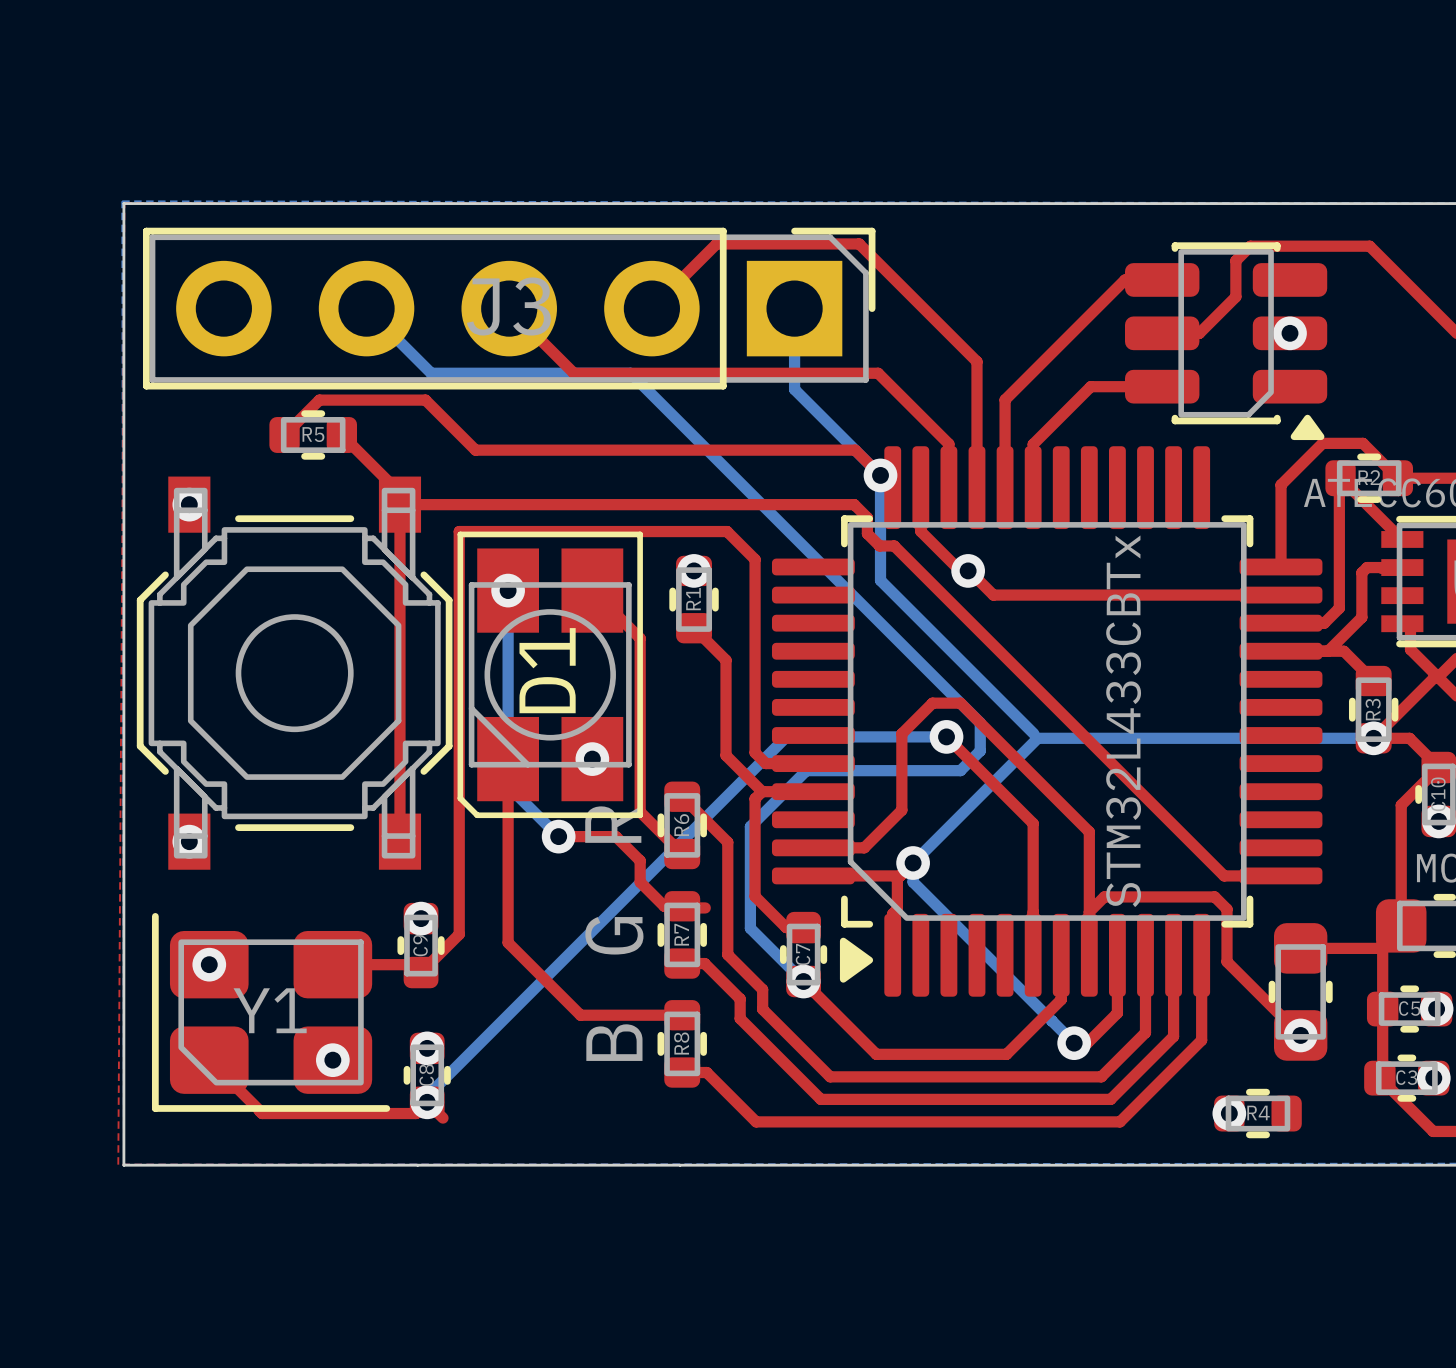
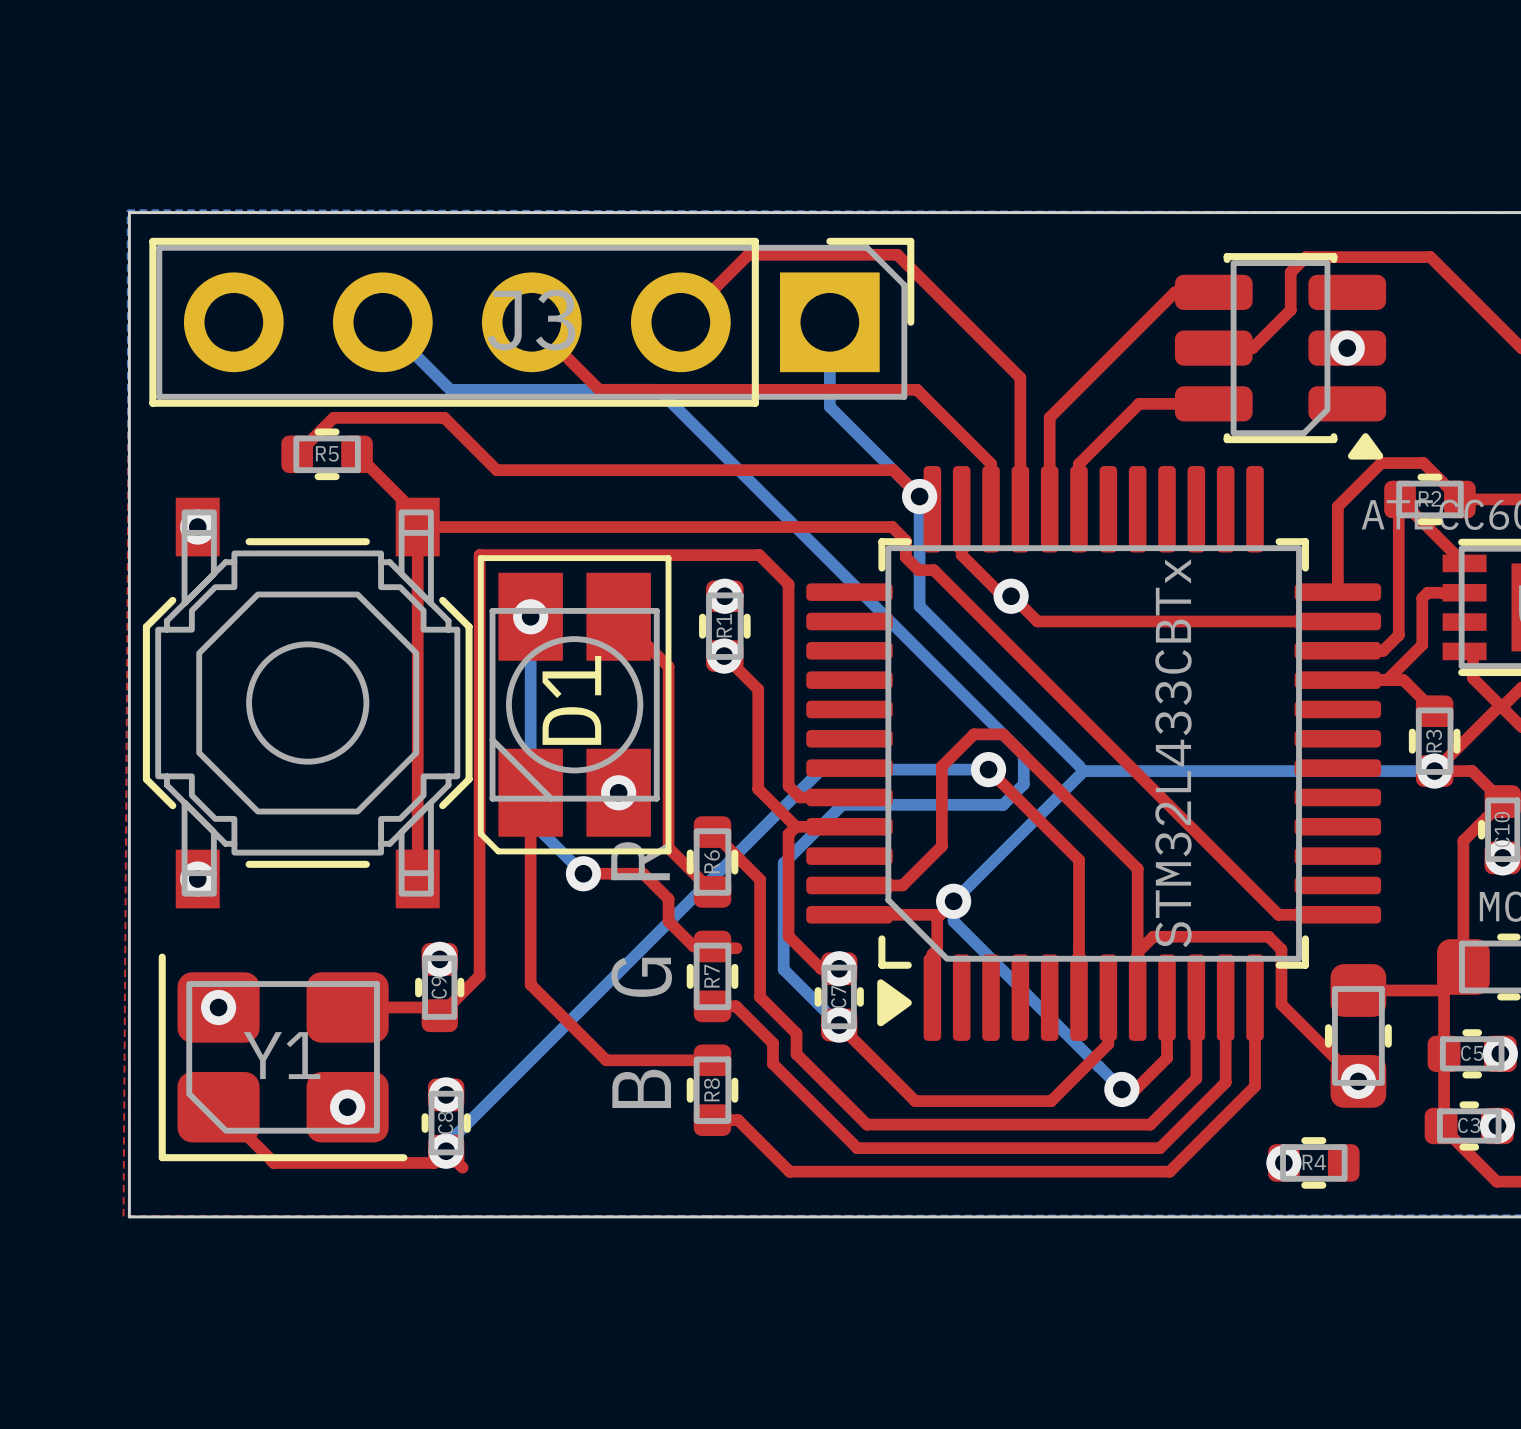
via: none -> (724, 656)
via: none -> (839, 968)

